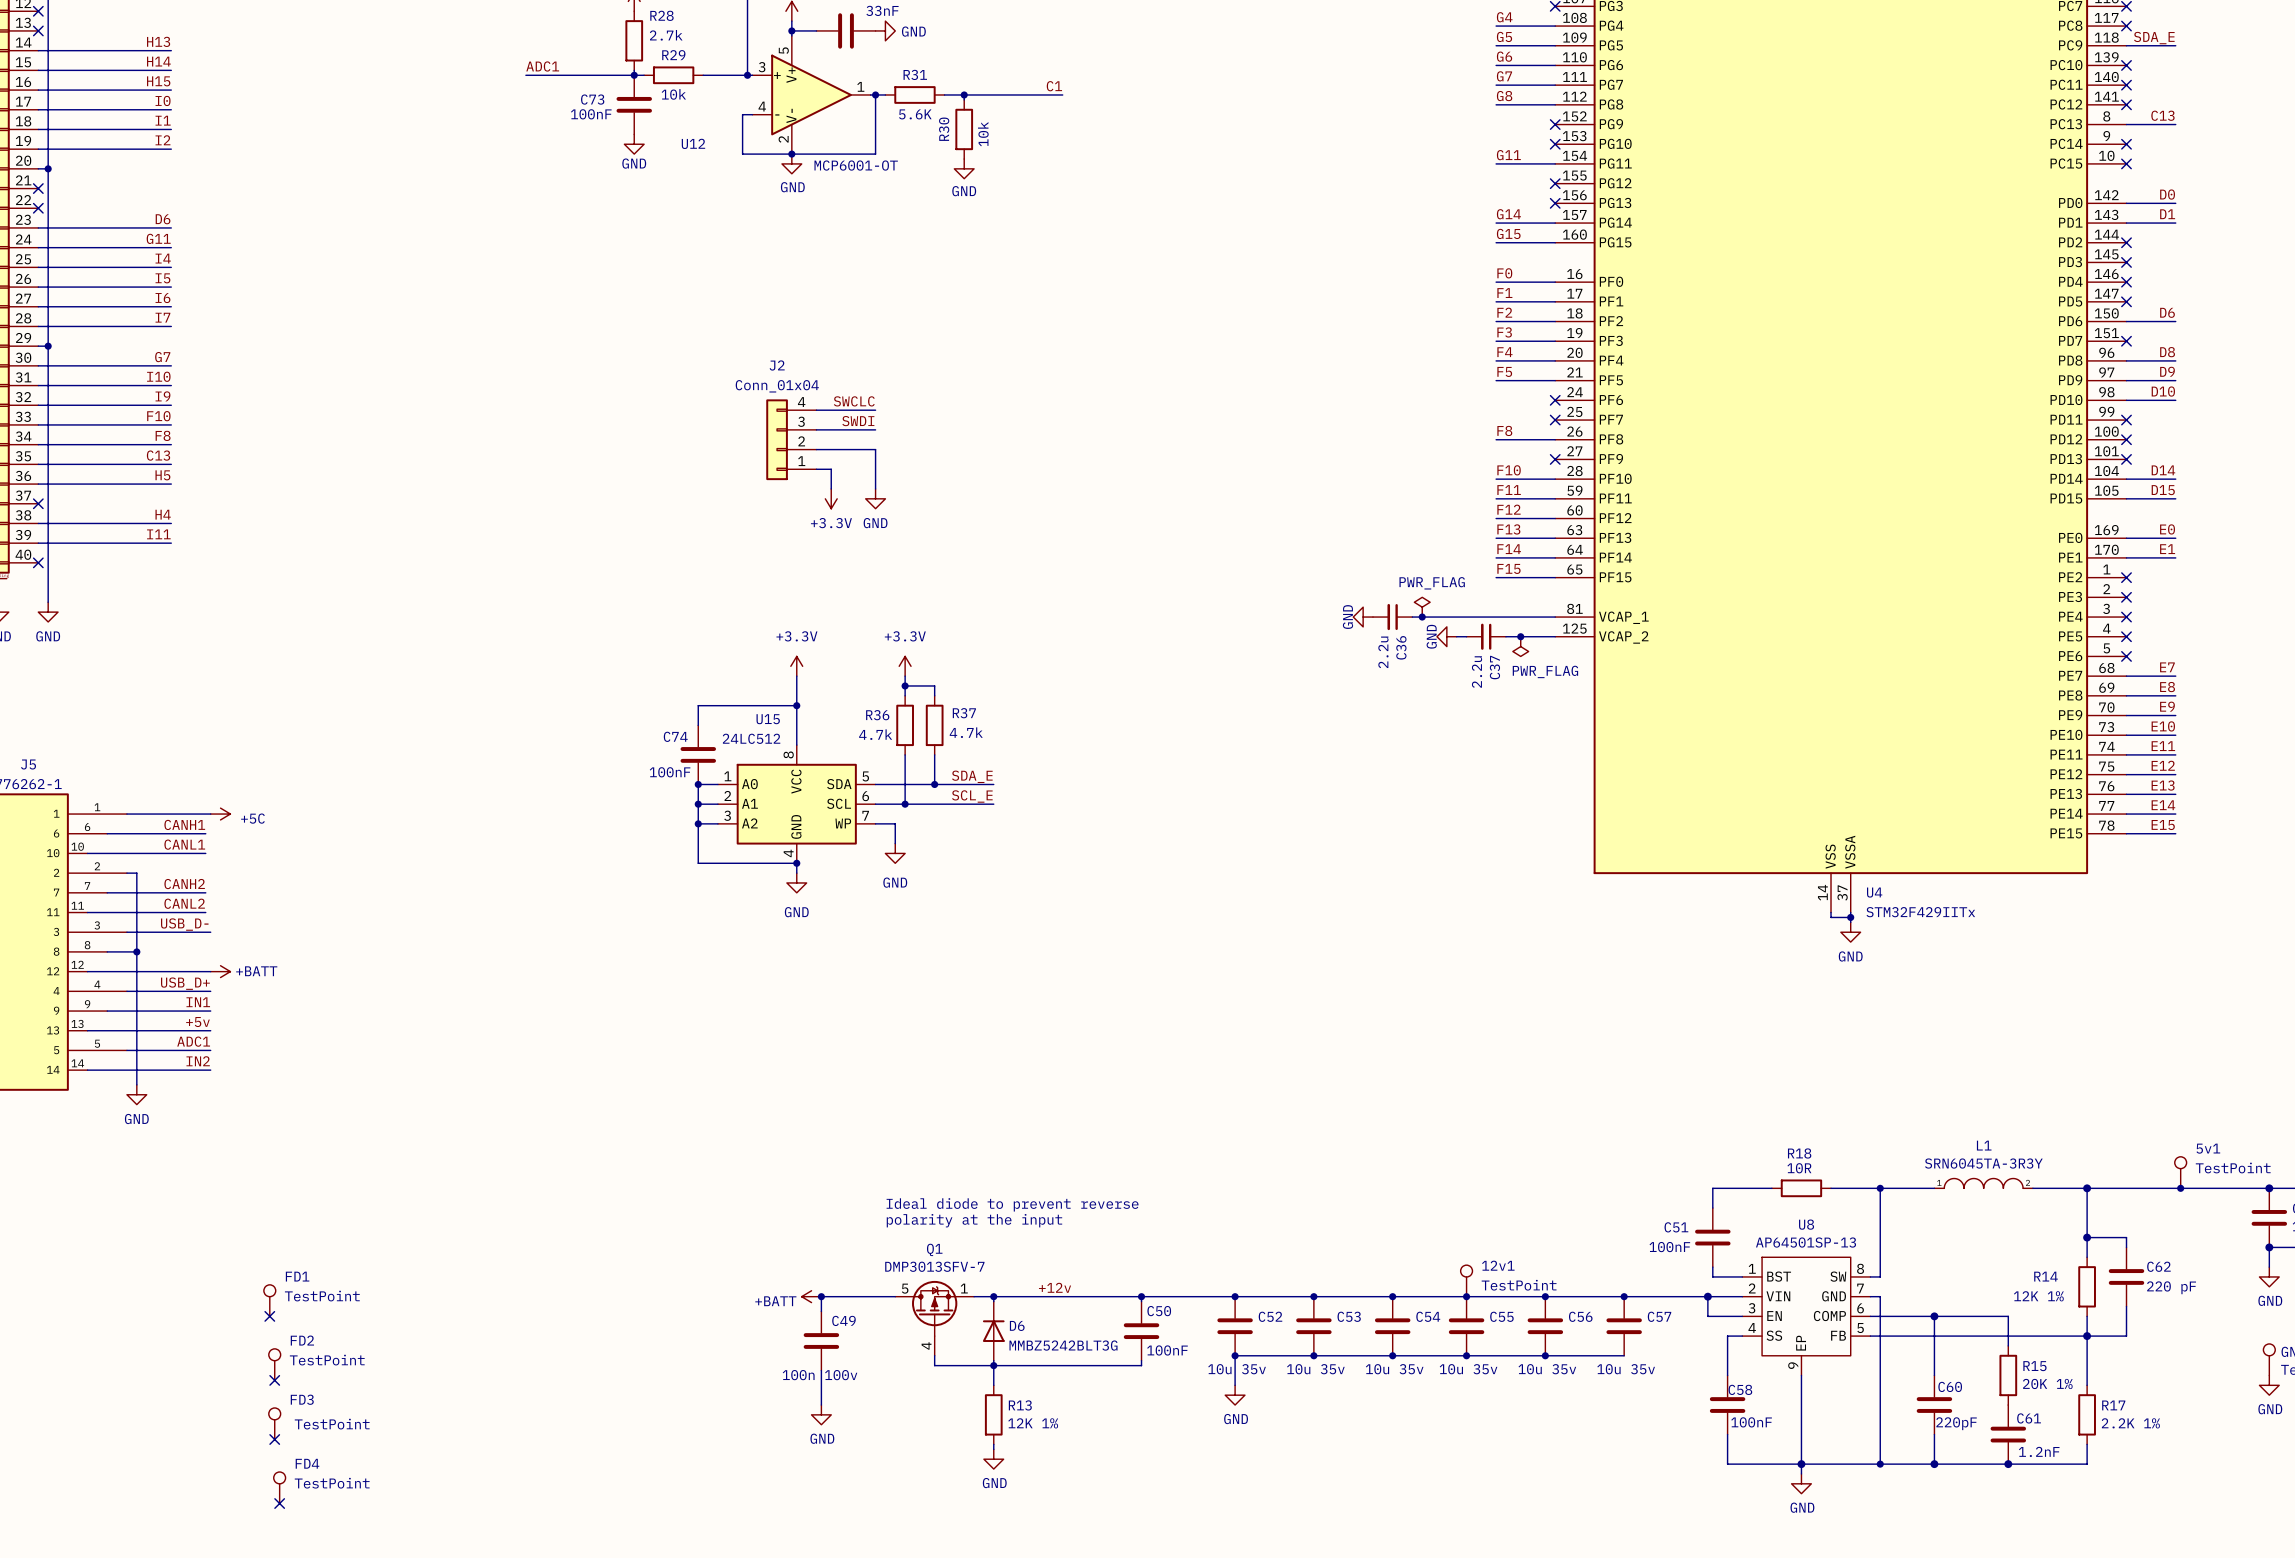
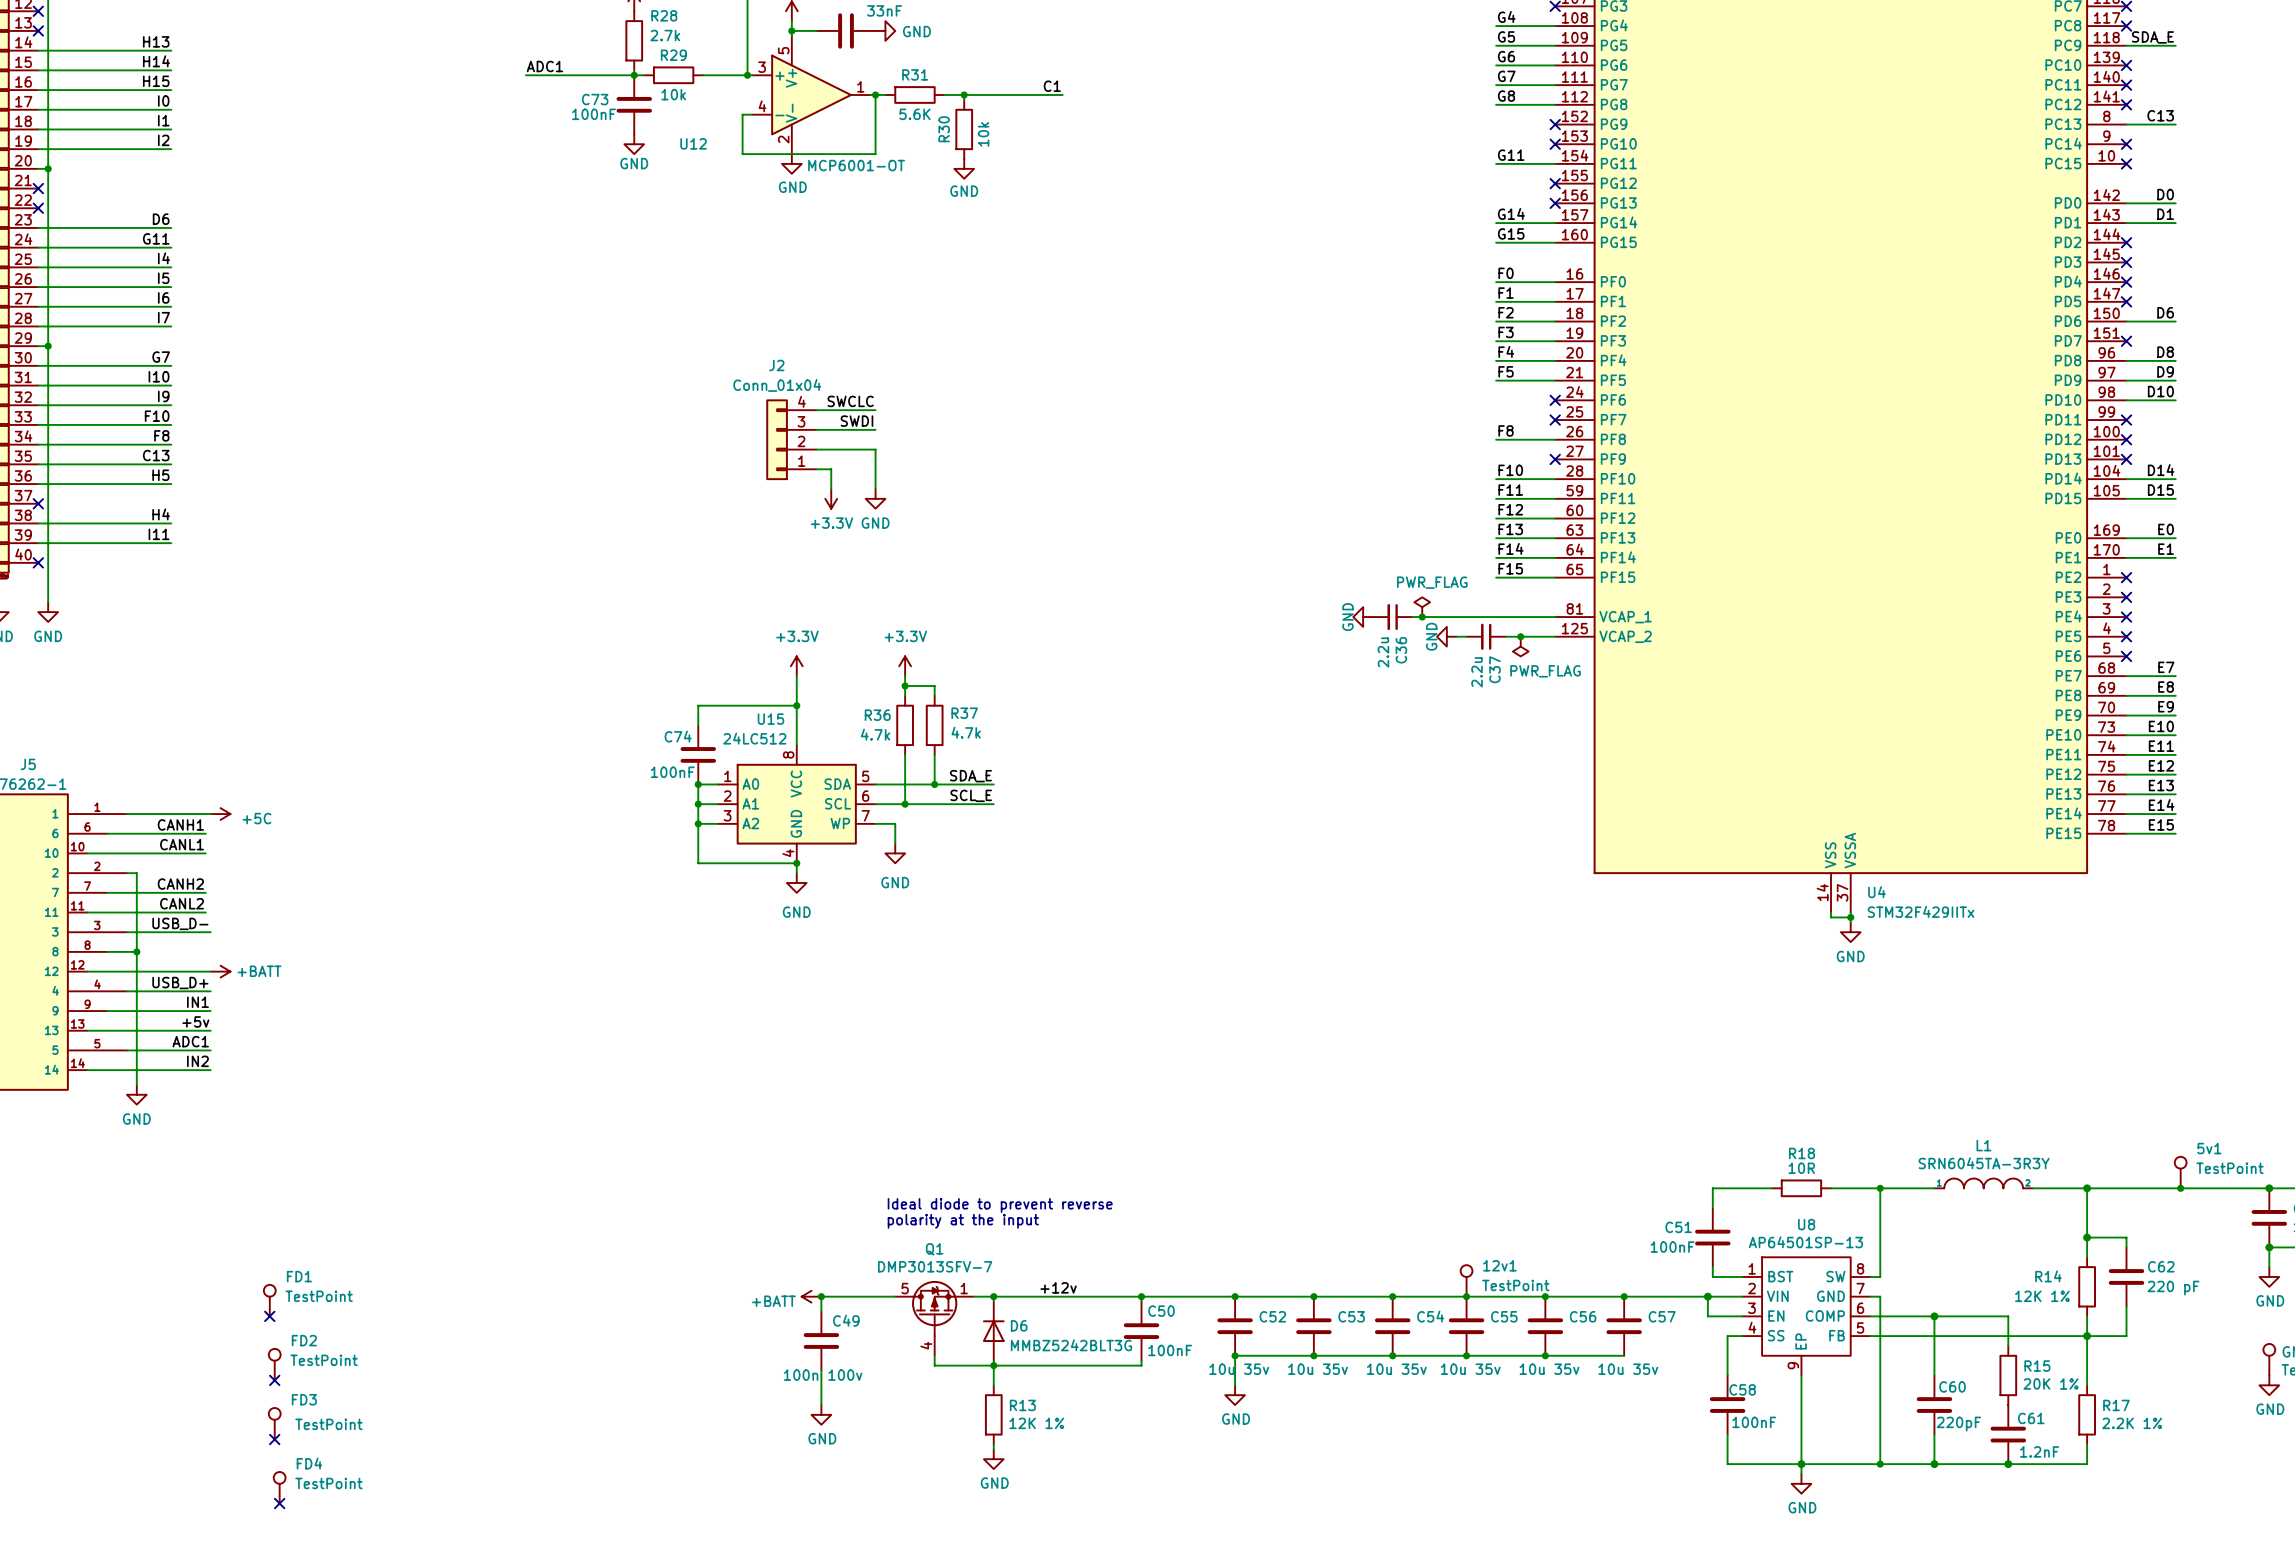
junction: (791, 154) -> none

